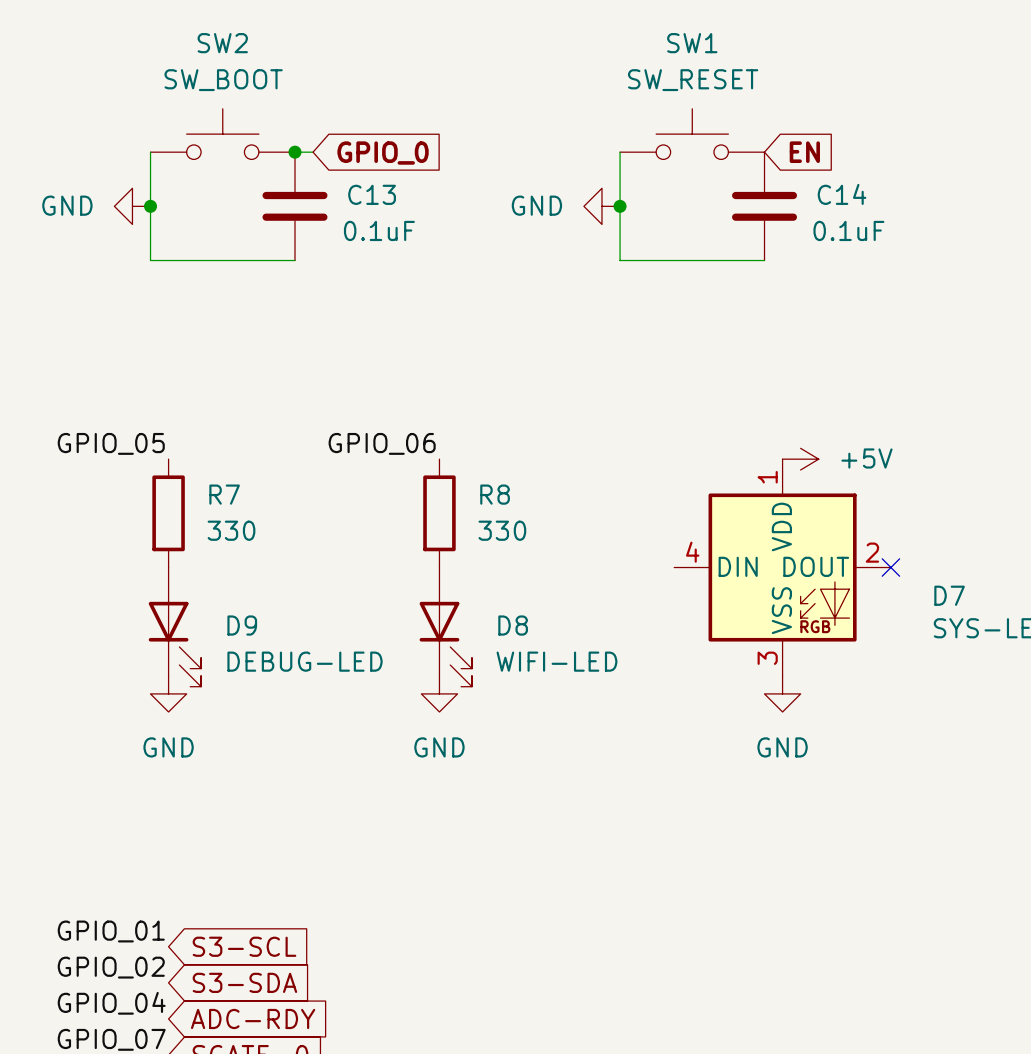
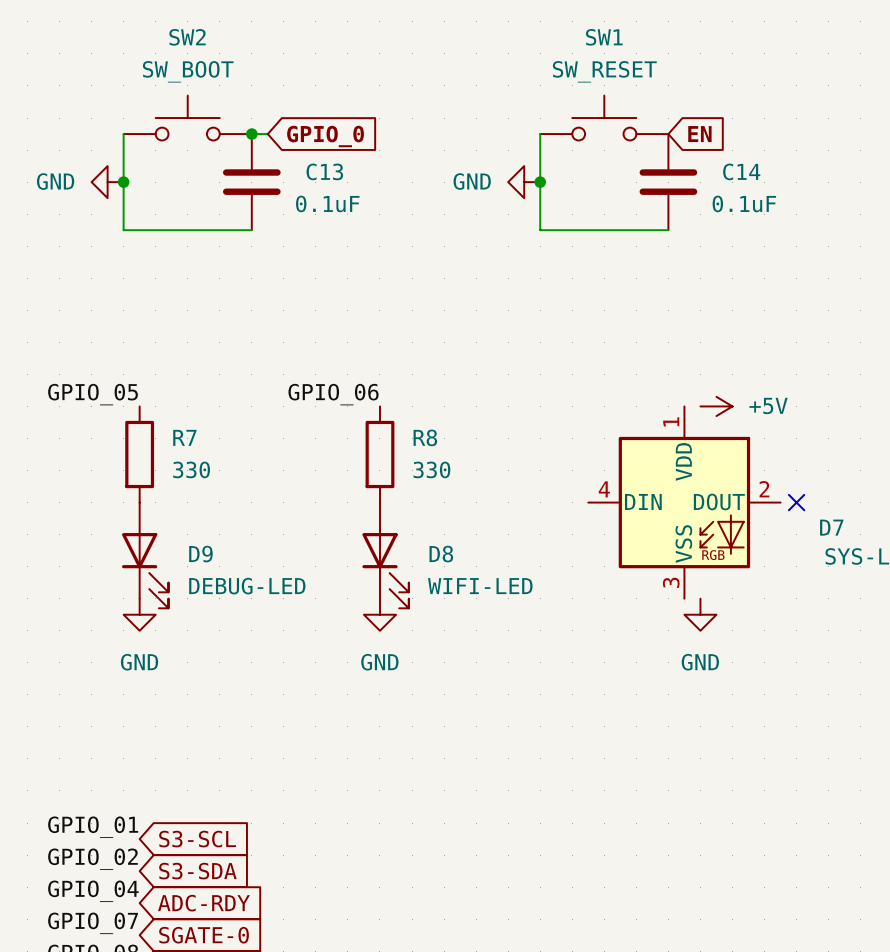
power symbol position: +5V (800, 459) -> +5V (716, 406)
no-connect mark position: (890, 567) -> (796, 502)
power symbol position: GND (782, 693) -> GND (700, 614)

